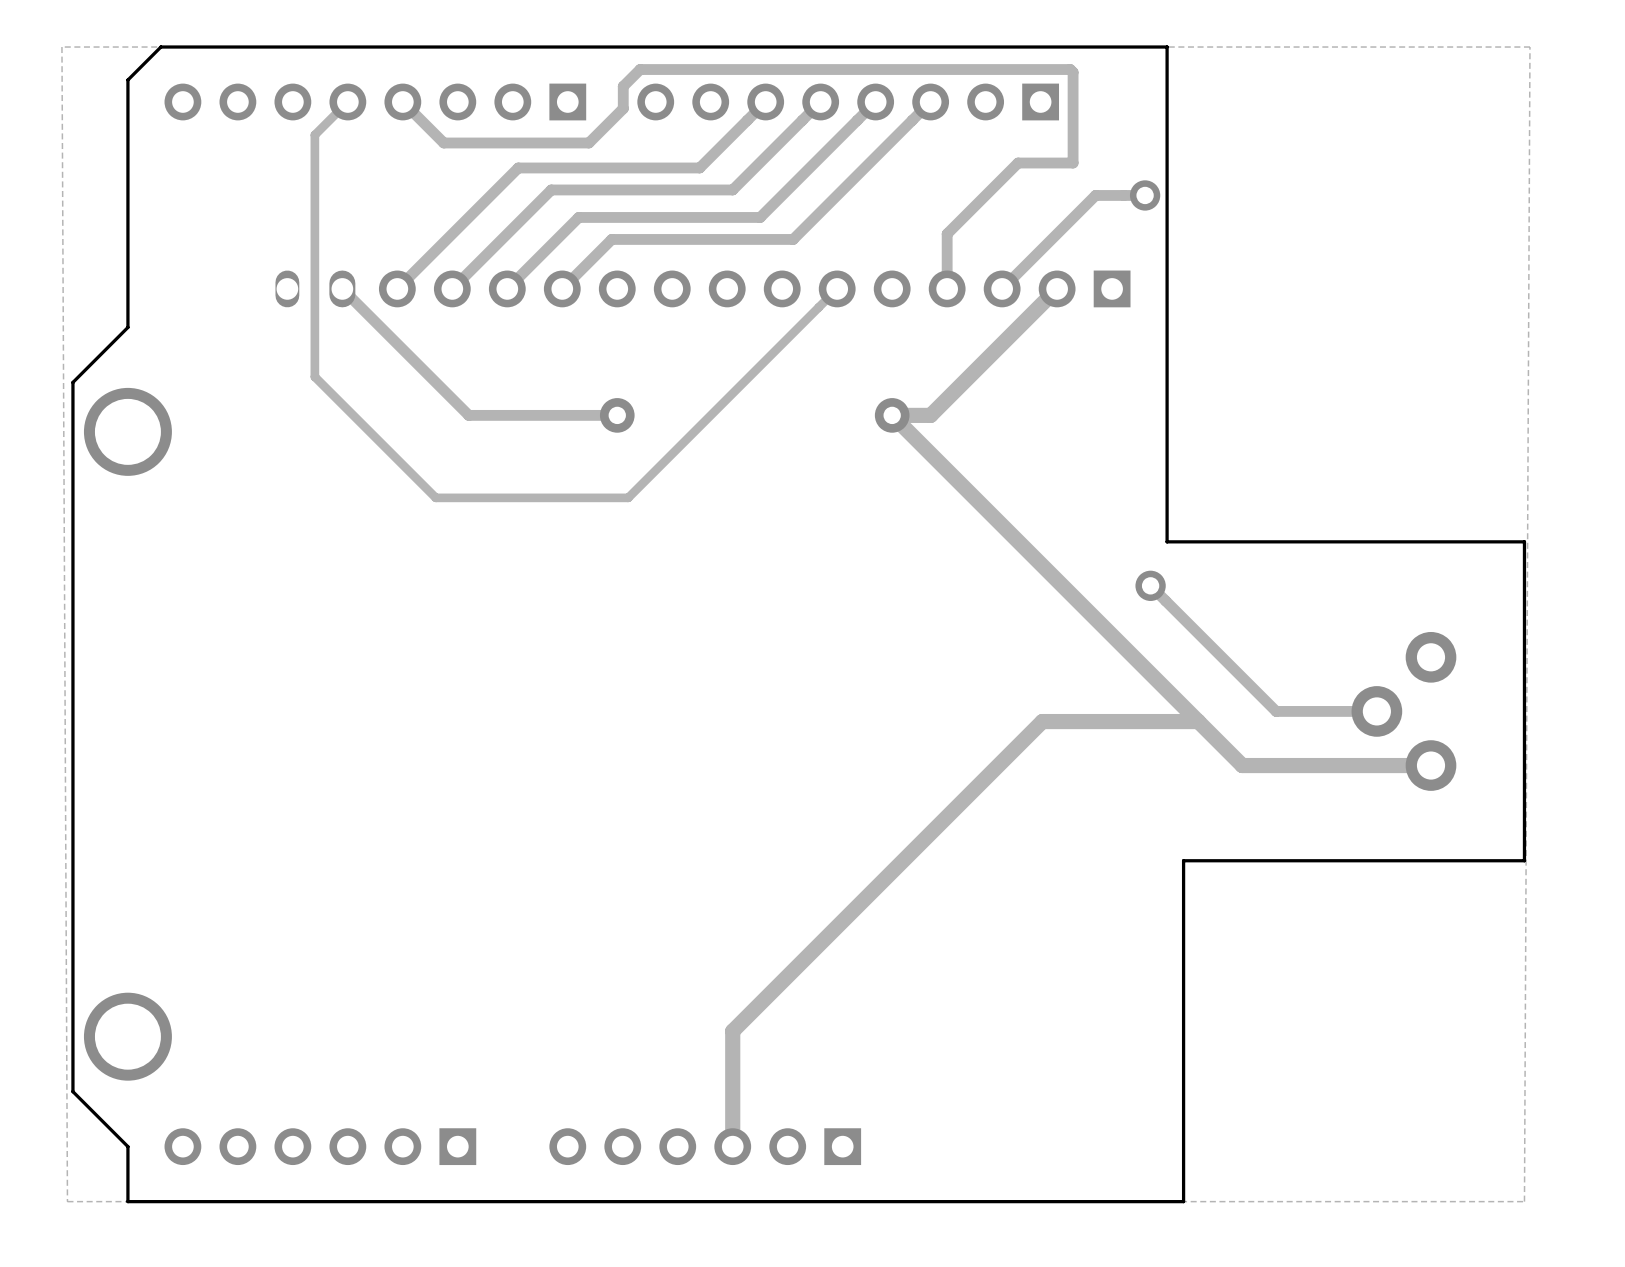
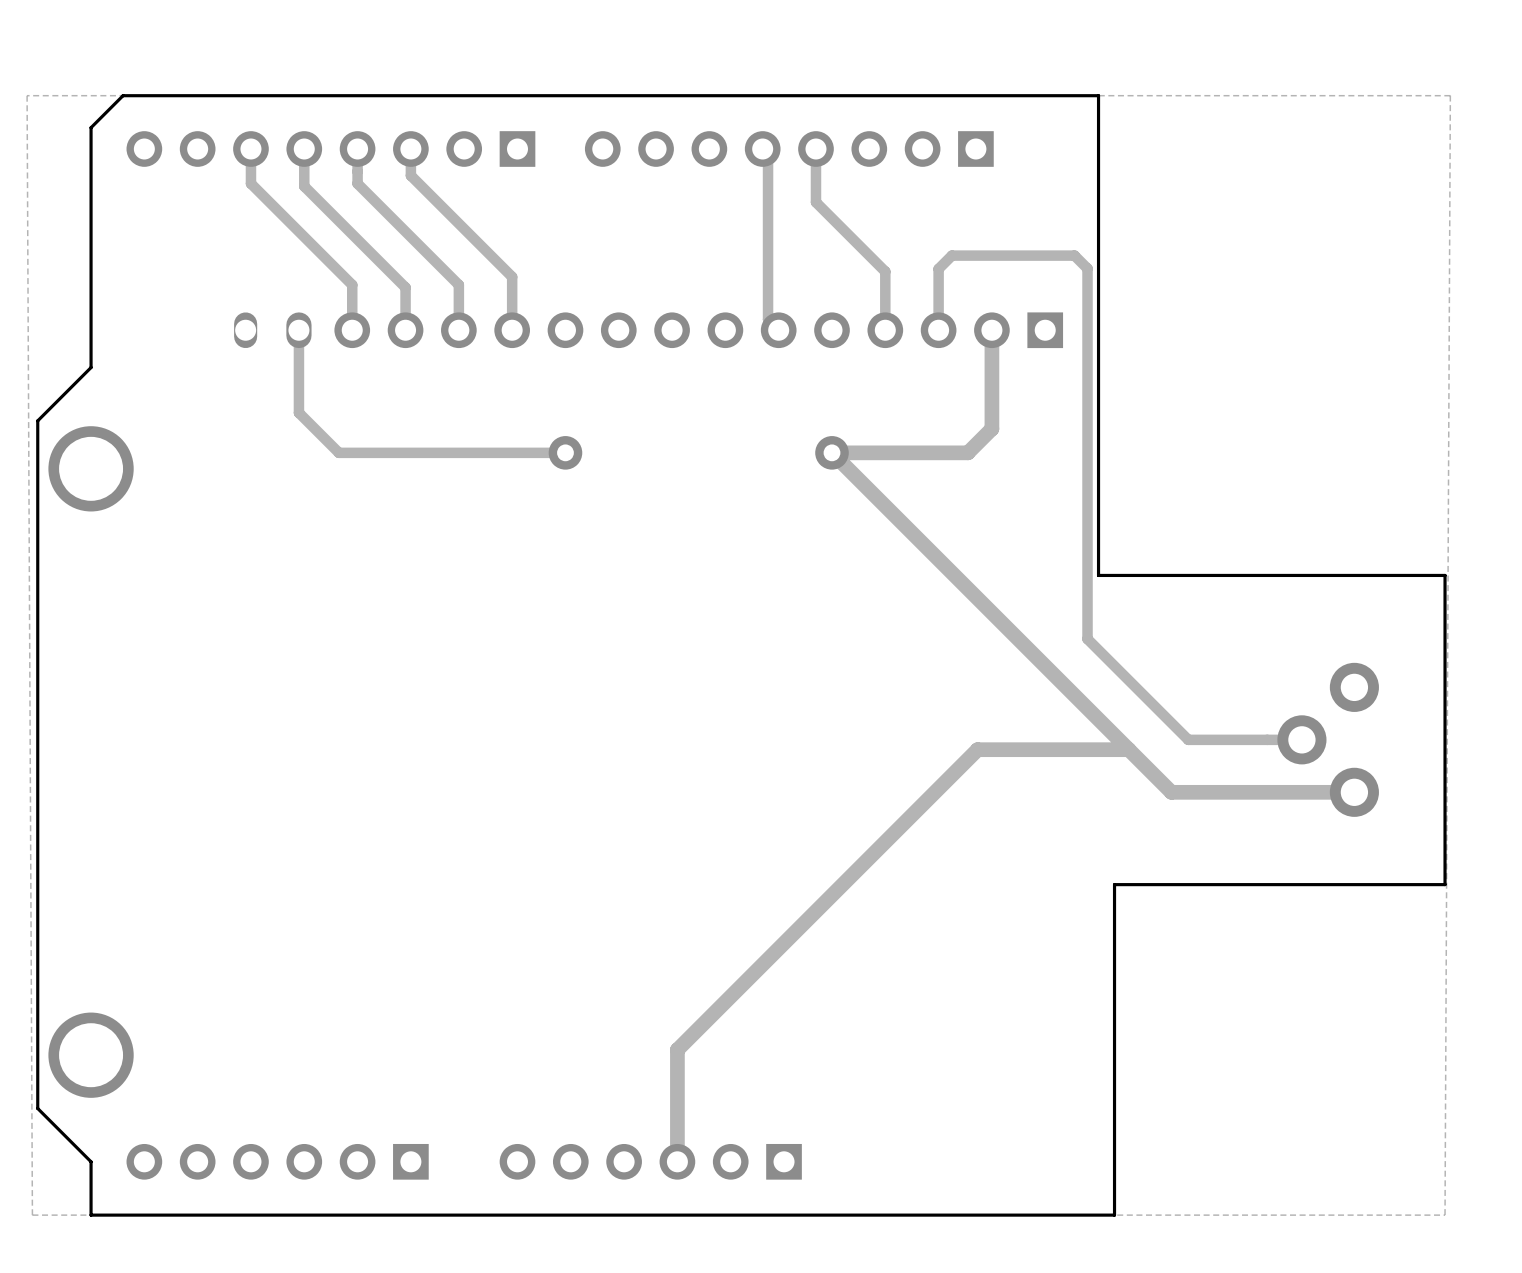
track: none -> (304, 146) (304, 186) (405, 287) (405, 330)
track: none -> (357, 146) (357, 183) (458, 284) (458, 330)
track: (347, 101) (314, 134) (314, 376) (435, 497) (628, 497) (837, 288) -> none
track: (402, 101) (443, 142) (588, 142) (623, 108) (623, 86) (640, 69) (1070, 69) (1073, 72) (1073, 163) (1018, 163) (947, 233) -> none
track: (765, 101) (699, 167) (518, 167) (397, 288) -> (250, 146) (250, 183) (352, 284) (352, 330)
track: (820, 101) (732, 189) (551, 189) (452, 288) -> (762, 149) (768, 154) (768, 319) (778, 330)
track: (875, 101) (760, 217) (578, 217) (507, 288) -> (815, 149) (815, 202) (885, 271) (885, 276)
track: (930, 101) (793, 239) (611, 239) (562, 288) -> (410, 146) (410, 175) (512, 276) (512, 330)
track: (1145, 195) (1095, 195) (1002, 288) -> none
via: (1145, 195) -> none
track: (342, 288) (468, 415) -> (298, 330) (298, 412) (338, 452) (421, 452)
track: (1057, 288) (930, 415) -> (991, 330) (991, 428) (967, 452) (869, 452)
track: (1150, 585) (1276, 711) -> (938, 330) (938, 268) (951, 255) (1074, 255) (1087, 268) (1087, 639) (1188, 739) (1204, 739)
via: (1150, 585) -> none

